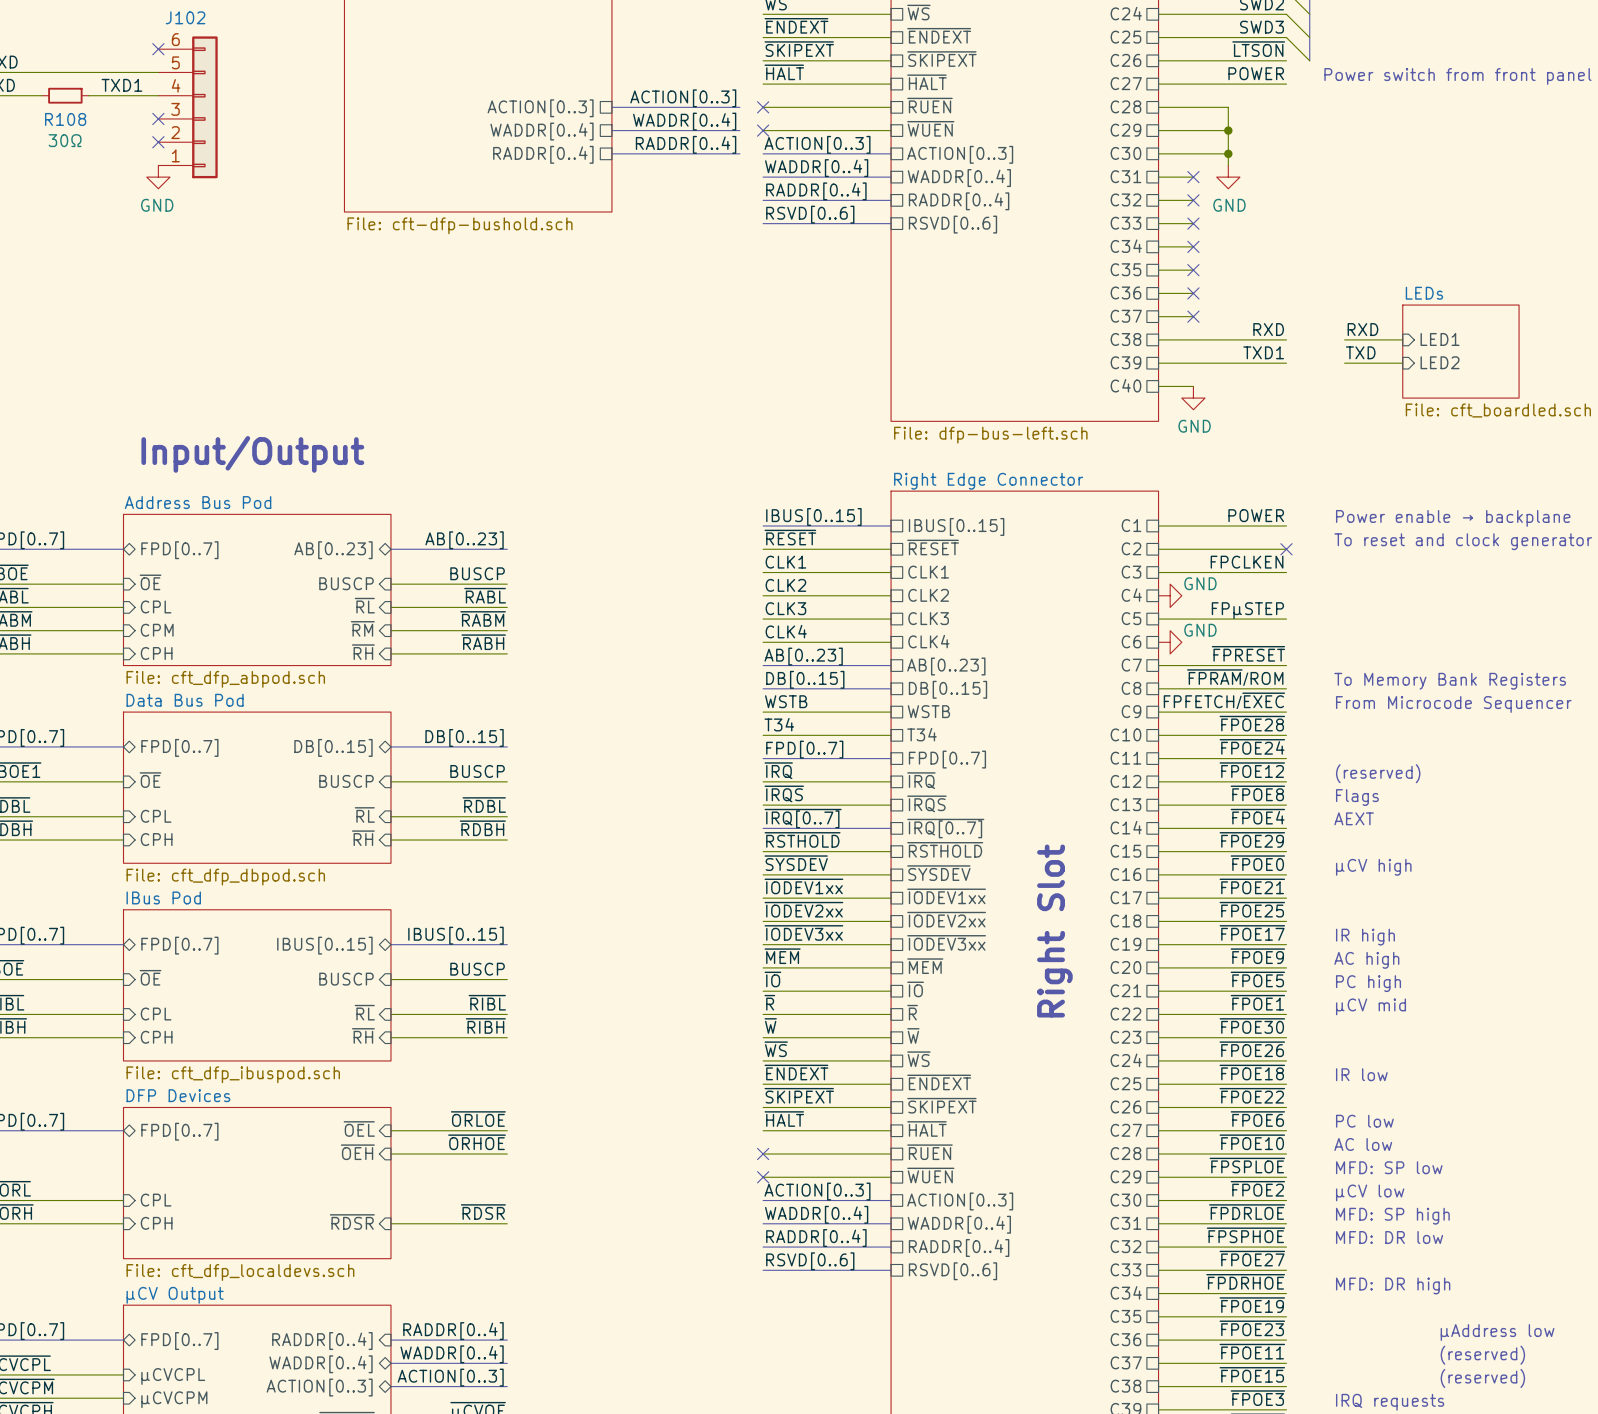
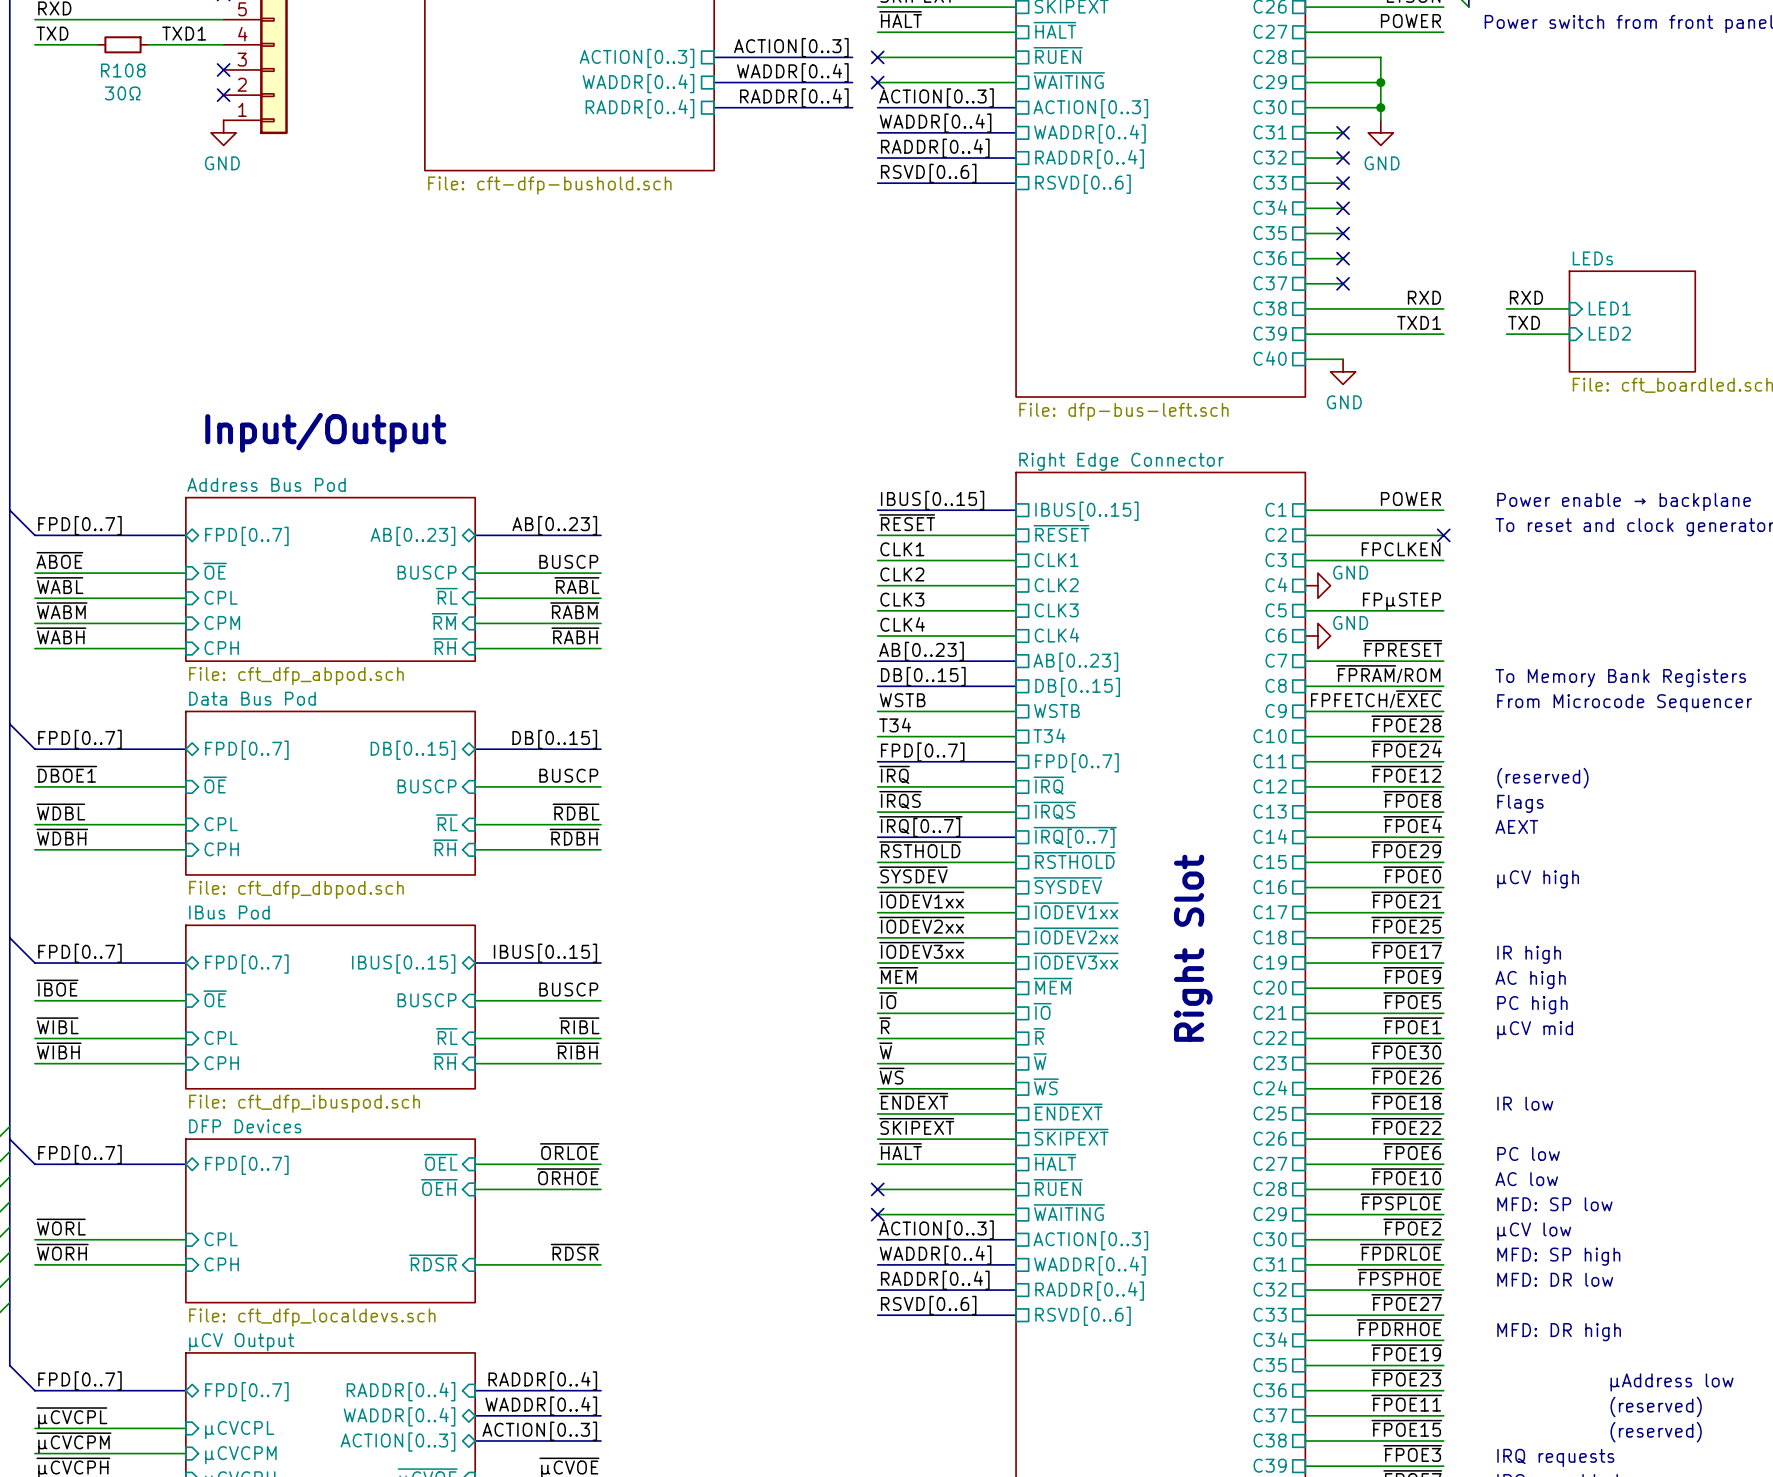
sheet pin: ~{WUEN} (930, 128) -> ~{WAITING} (1069, 80)
sheet pin: ~{WUEN} (930, 1175) -> ~{WAITING} (1069, 1212)

